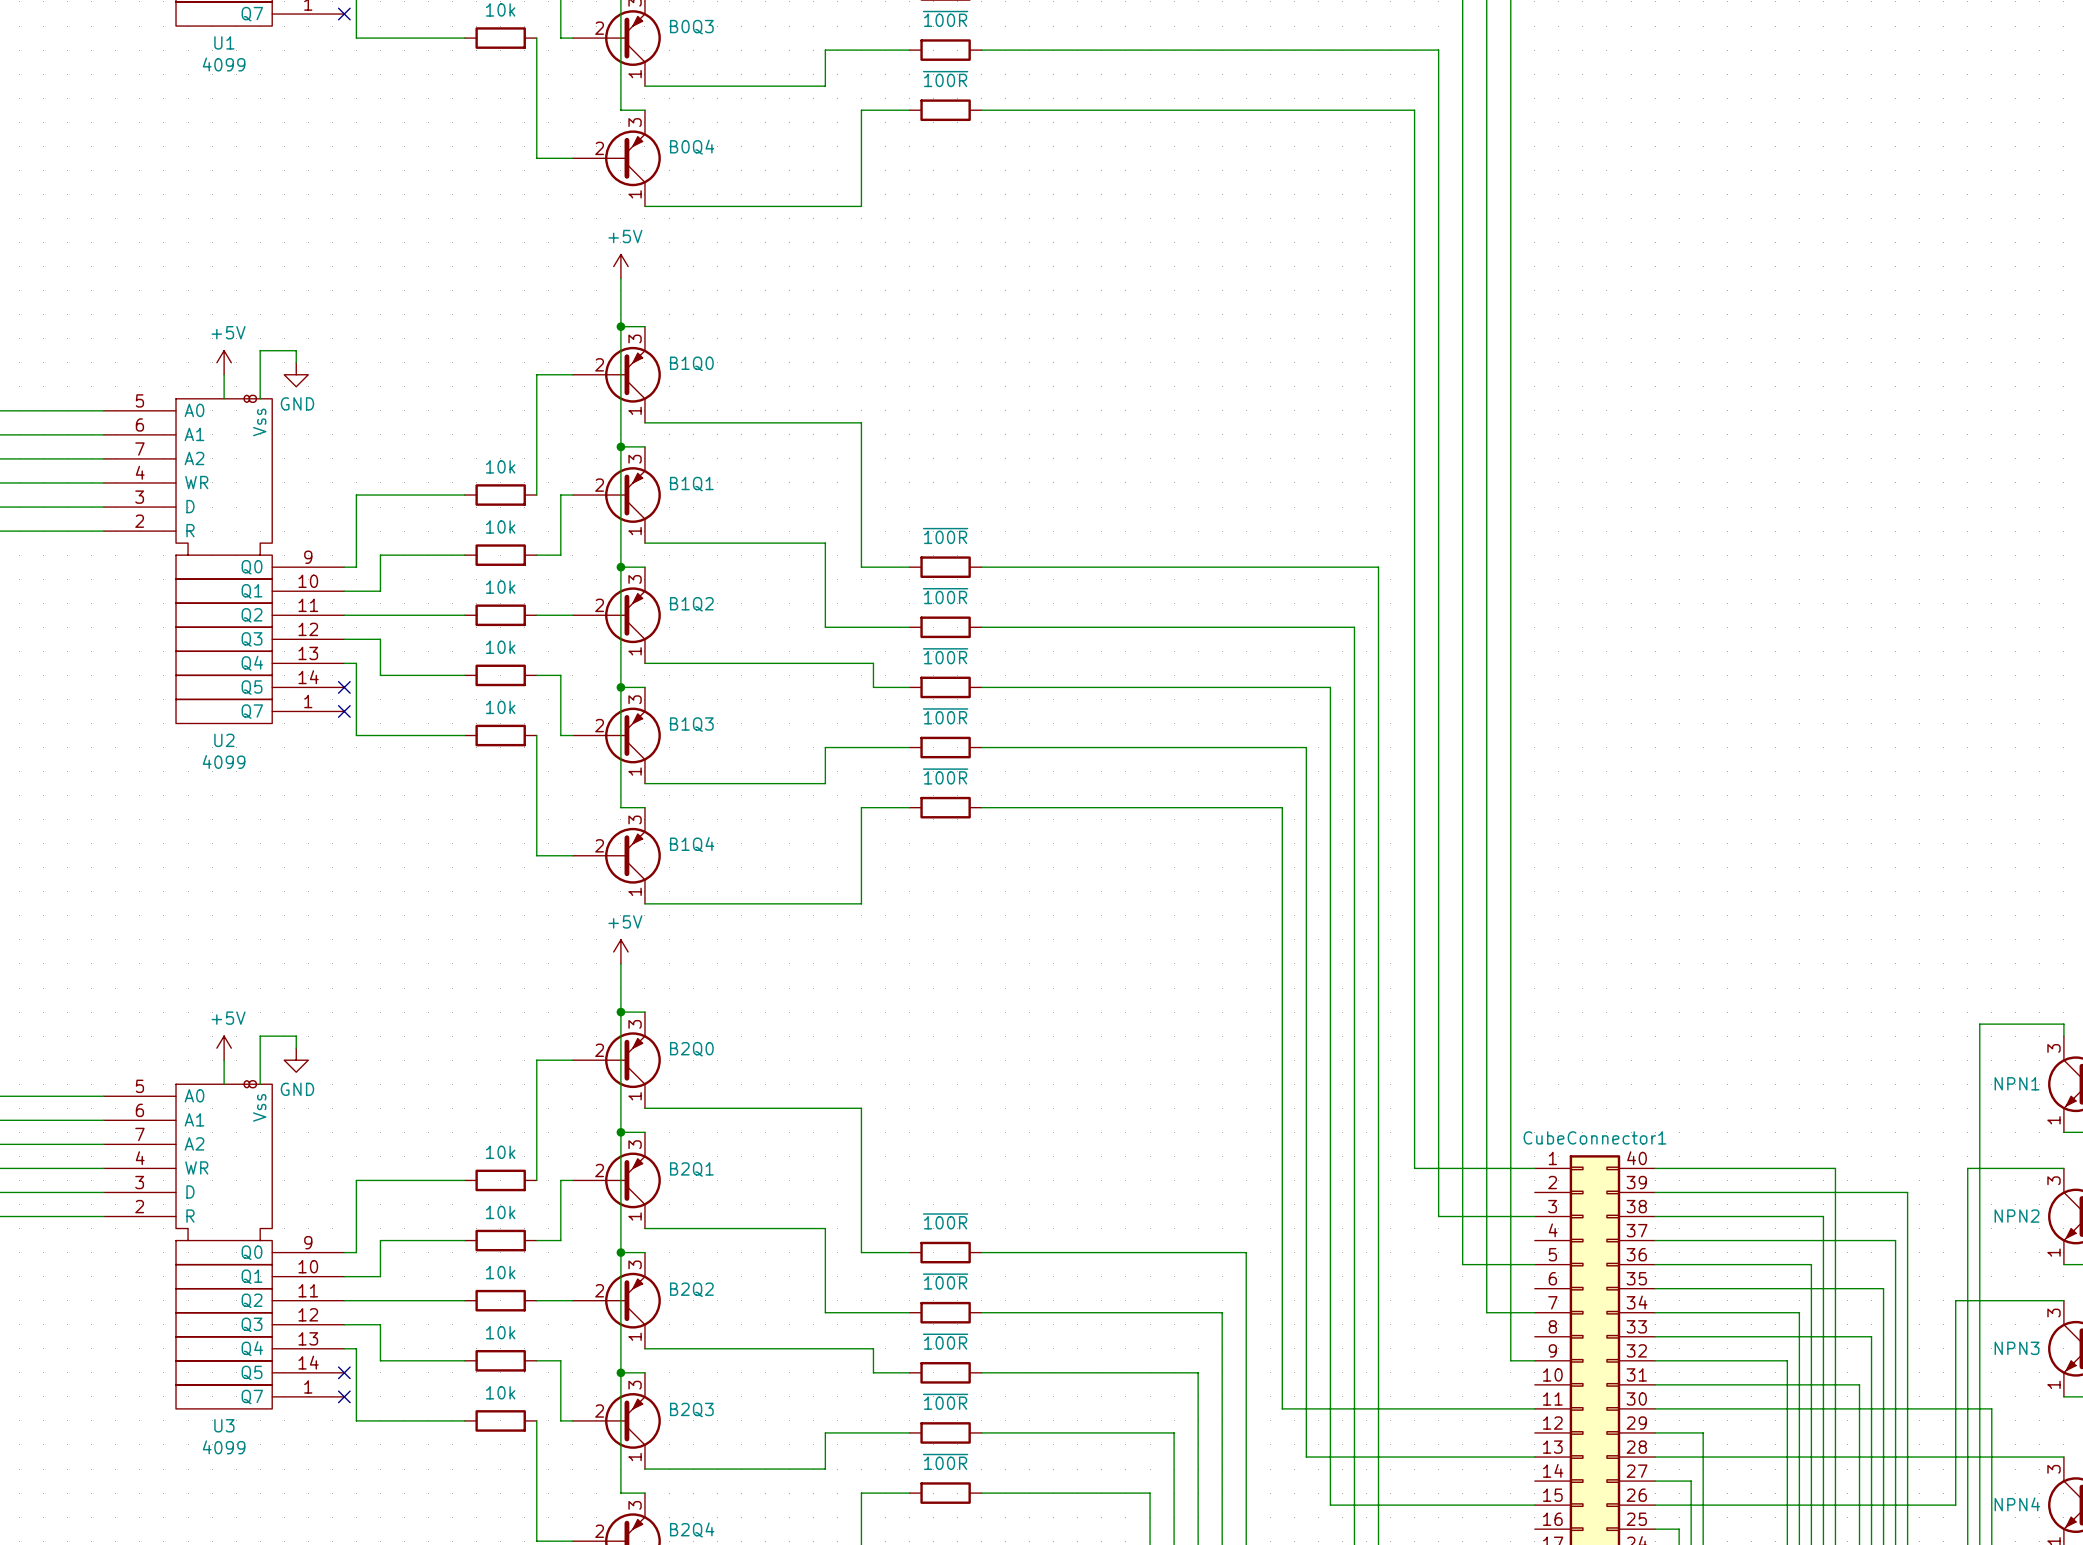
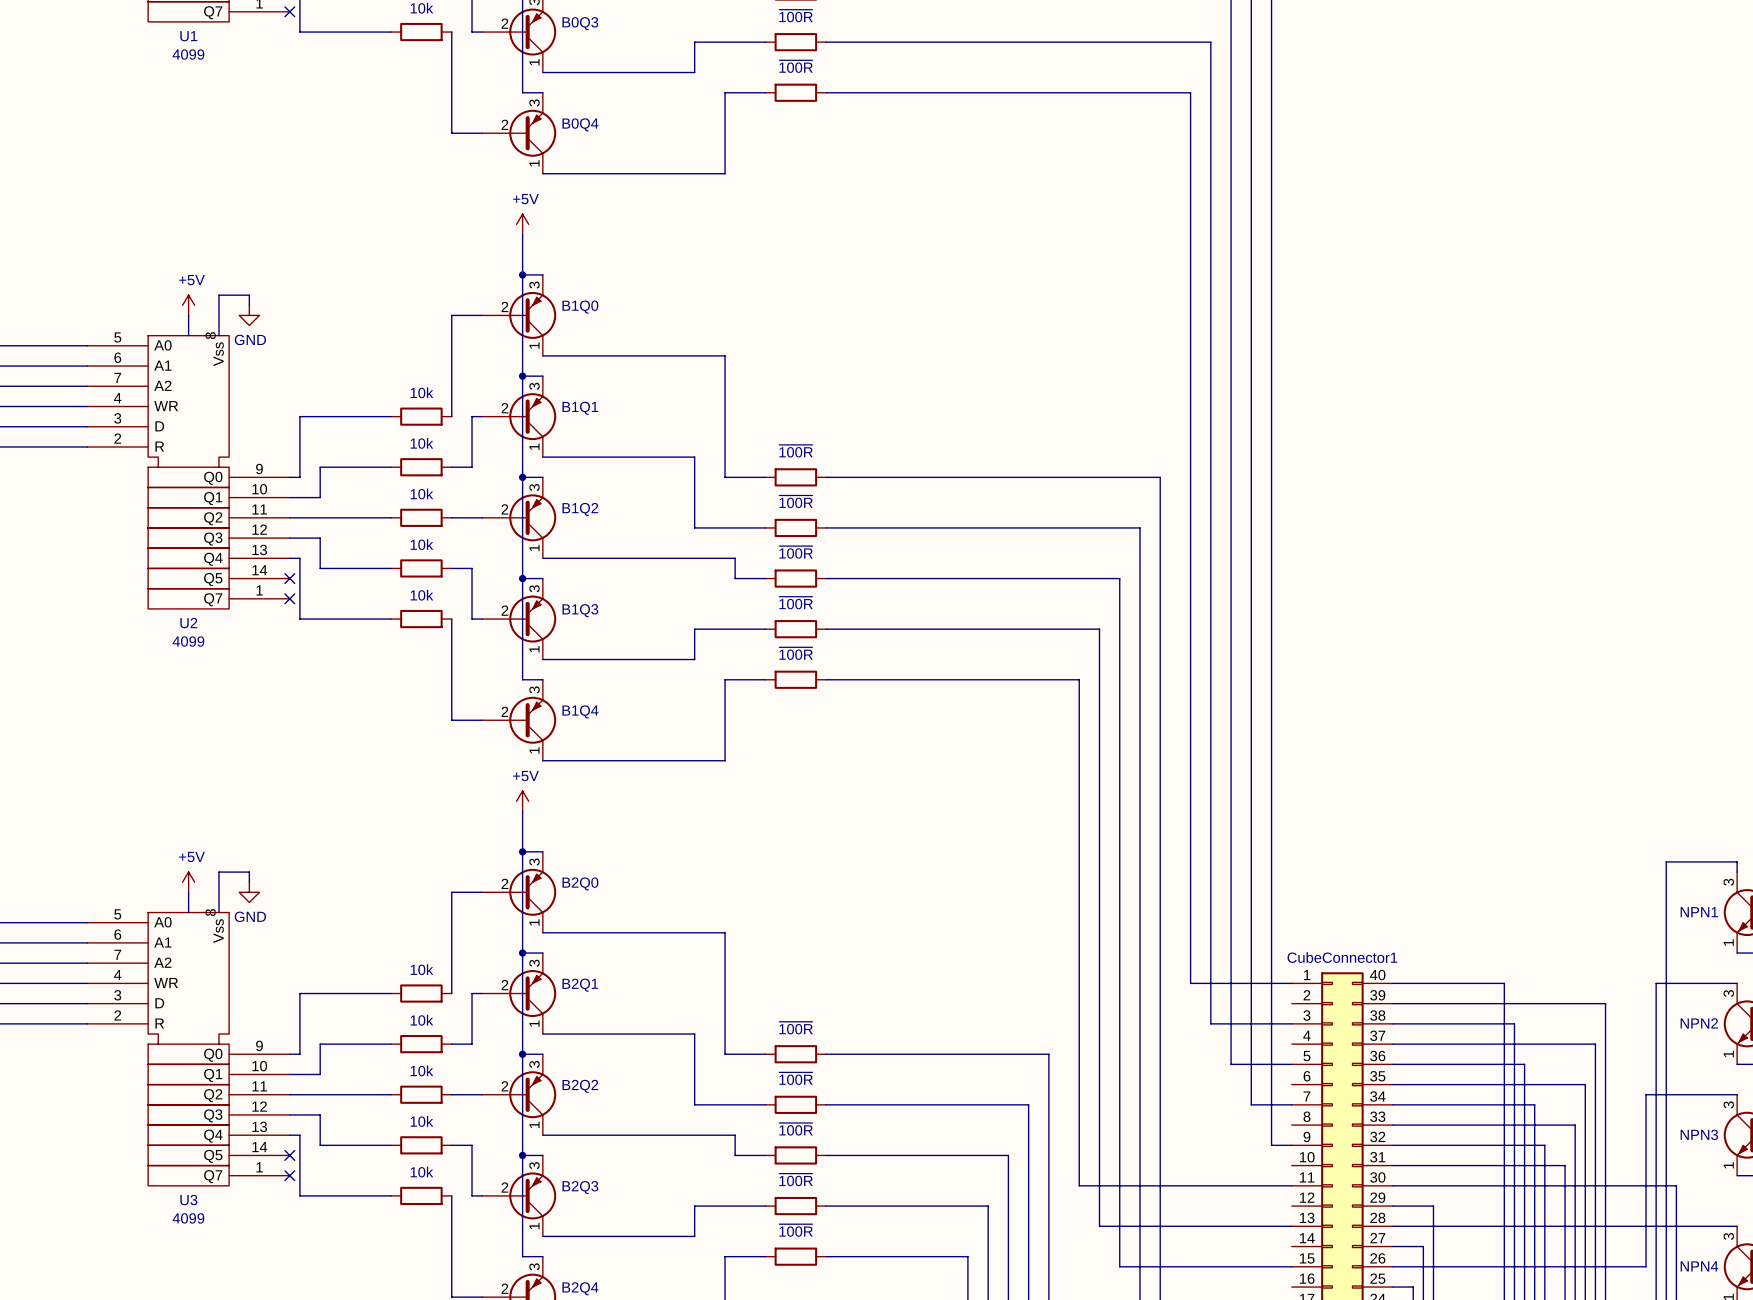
wire: (1787, 1168) (1835, 1168) (1835, 1360) -> (1504, 983) (1504, 1145) (1544, 1145)
wire: (1799, 1216) (1823, 1216) (1823, 1312) -> (1514, 1023) (1514, 1104) (1534, 1104)

